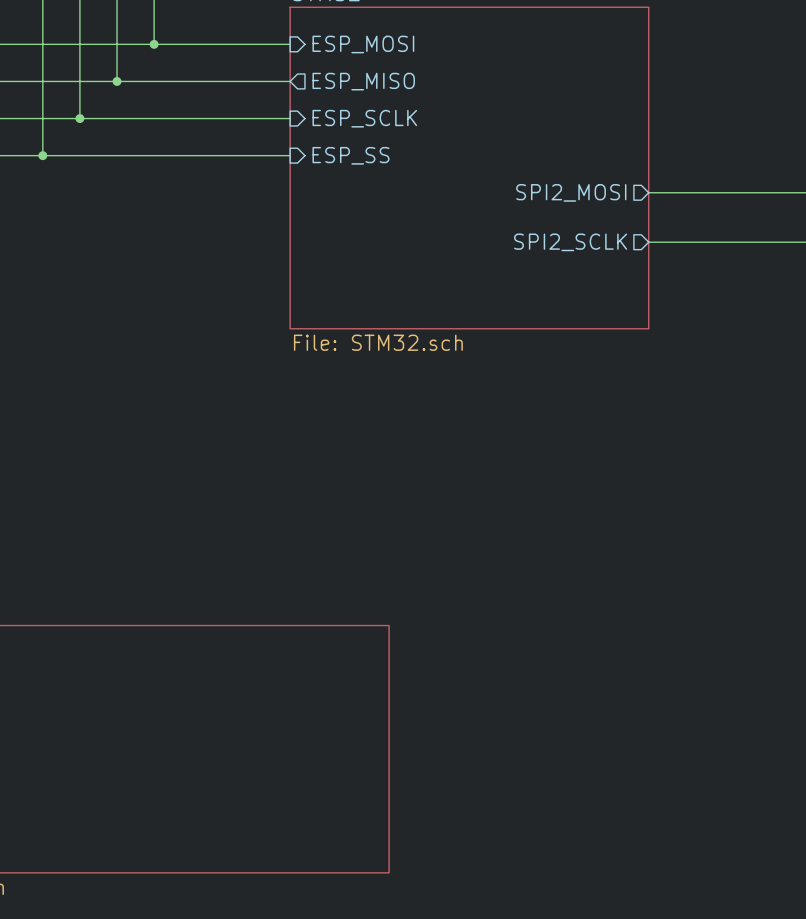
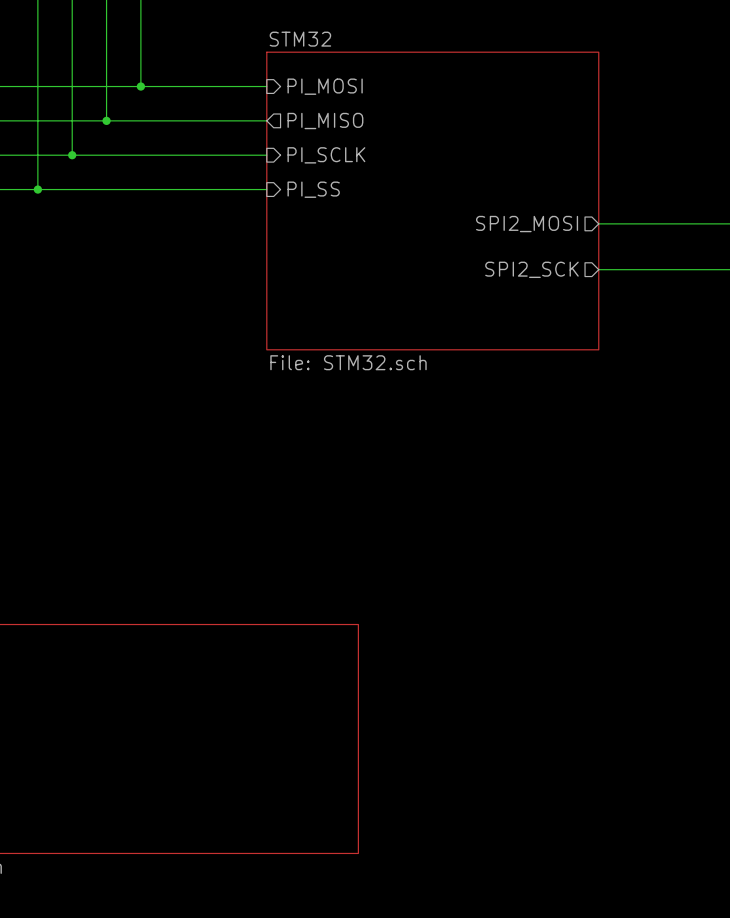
sheet pin: ESP_MOSI (363, 44) -> PI_MOSI (325, 86)
sheet pin: ESP_MISO (363, 81) -> PI_MISO (325, 121)
sheet pin: ESP_SCLK (364, 118) -> PI_SCLK (326, 155)
sheet pin: ESP_SS (351, 155) -> PI_SS (313, 189)
sheet pin: SPI2_SCLK (570, 242) -> SPI2_SCK (531, 269)

